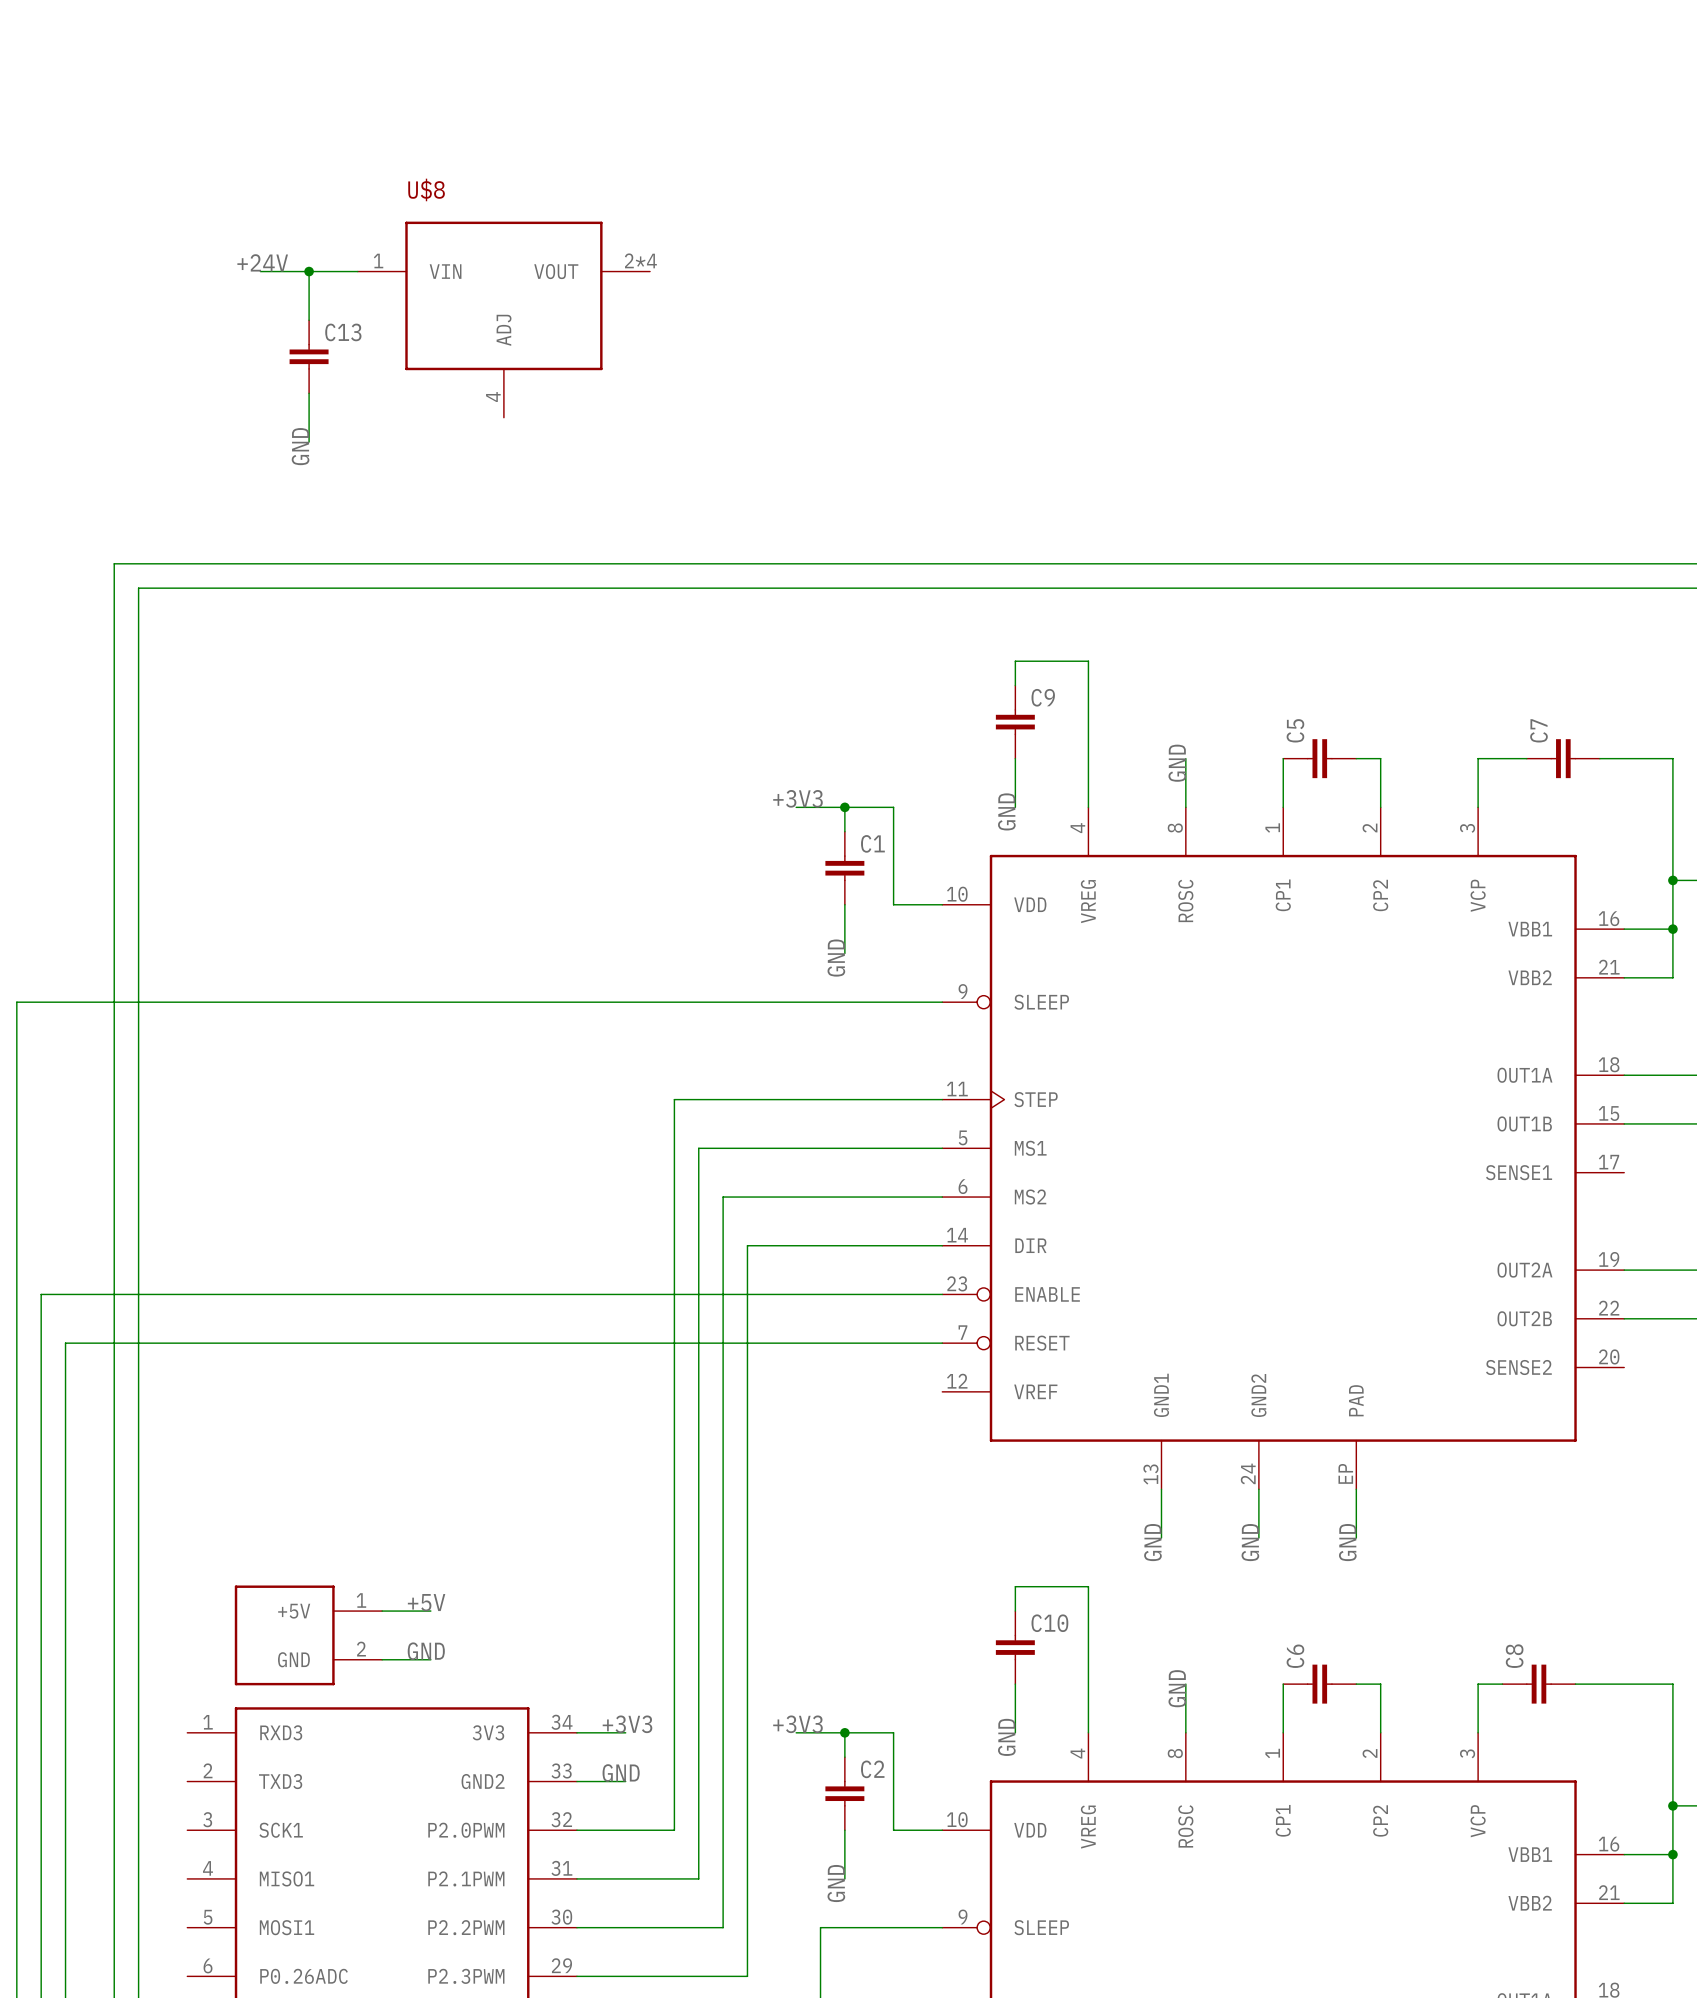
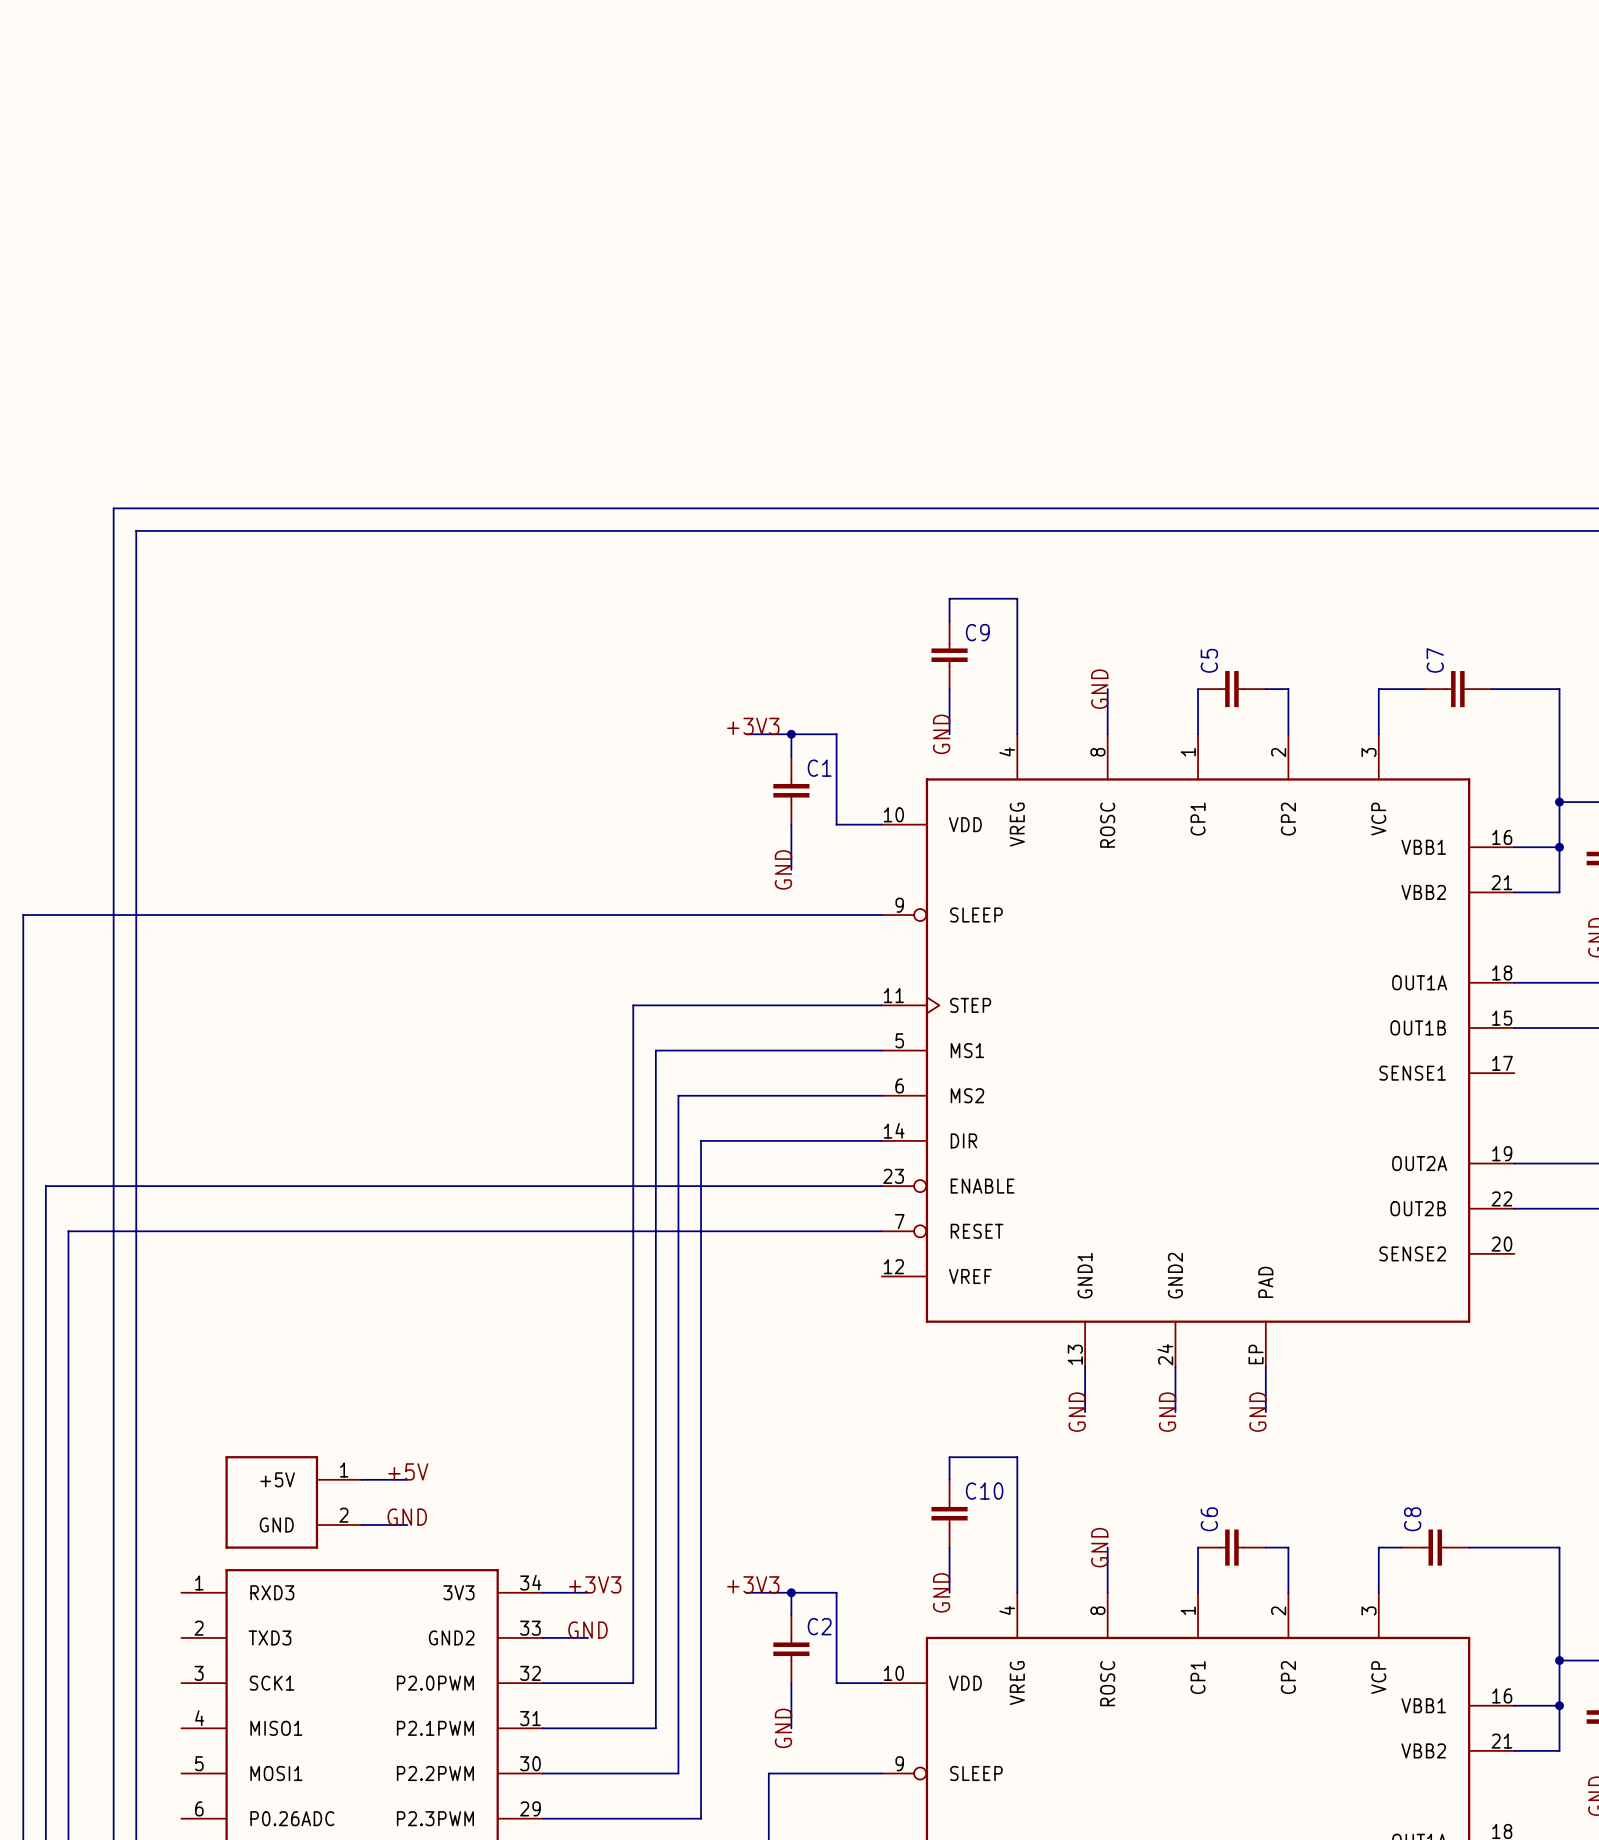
label: +24V (262, 262) -> none
wire: (260, 271) (357, 271) -> none
wire: (309, 271) (309, 320) -> none
junction: (309, 271) -> none
U$8: (503, 319) -> none
C13: (309, 356) -> none
wire: (309, 393) (309, 442) -> none
label: GND (300, 446) -> none

